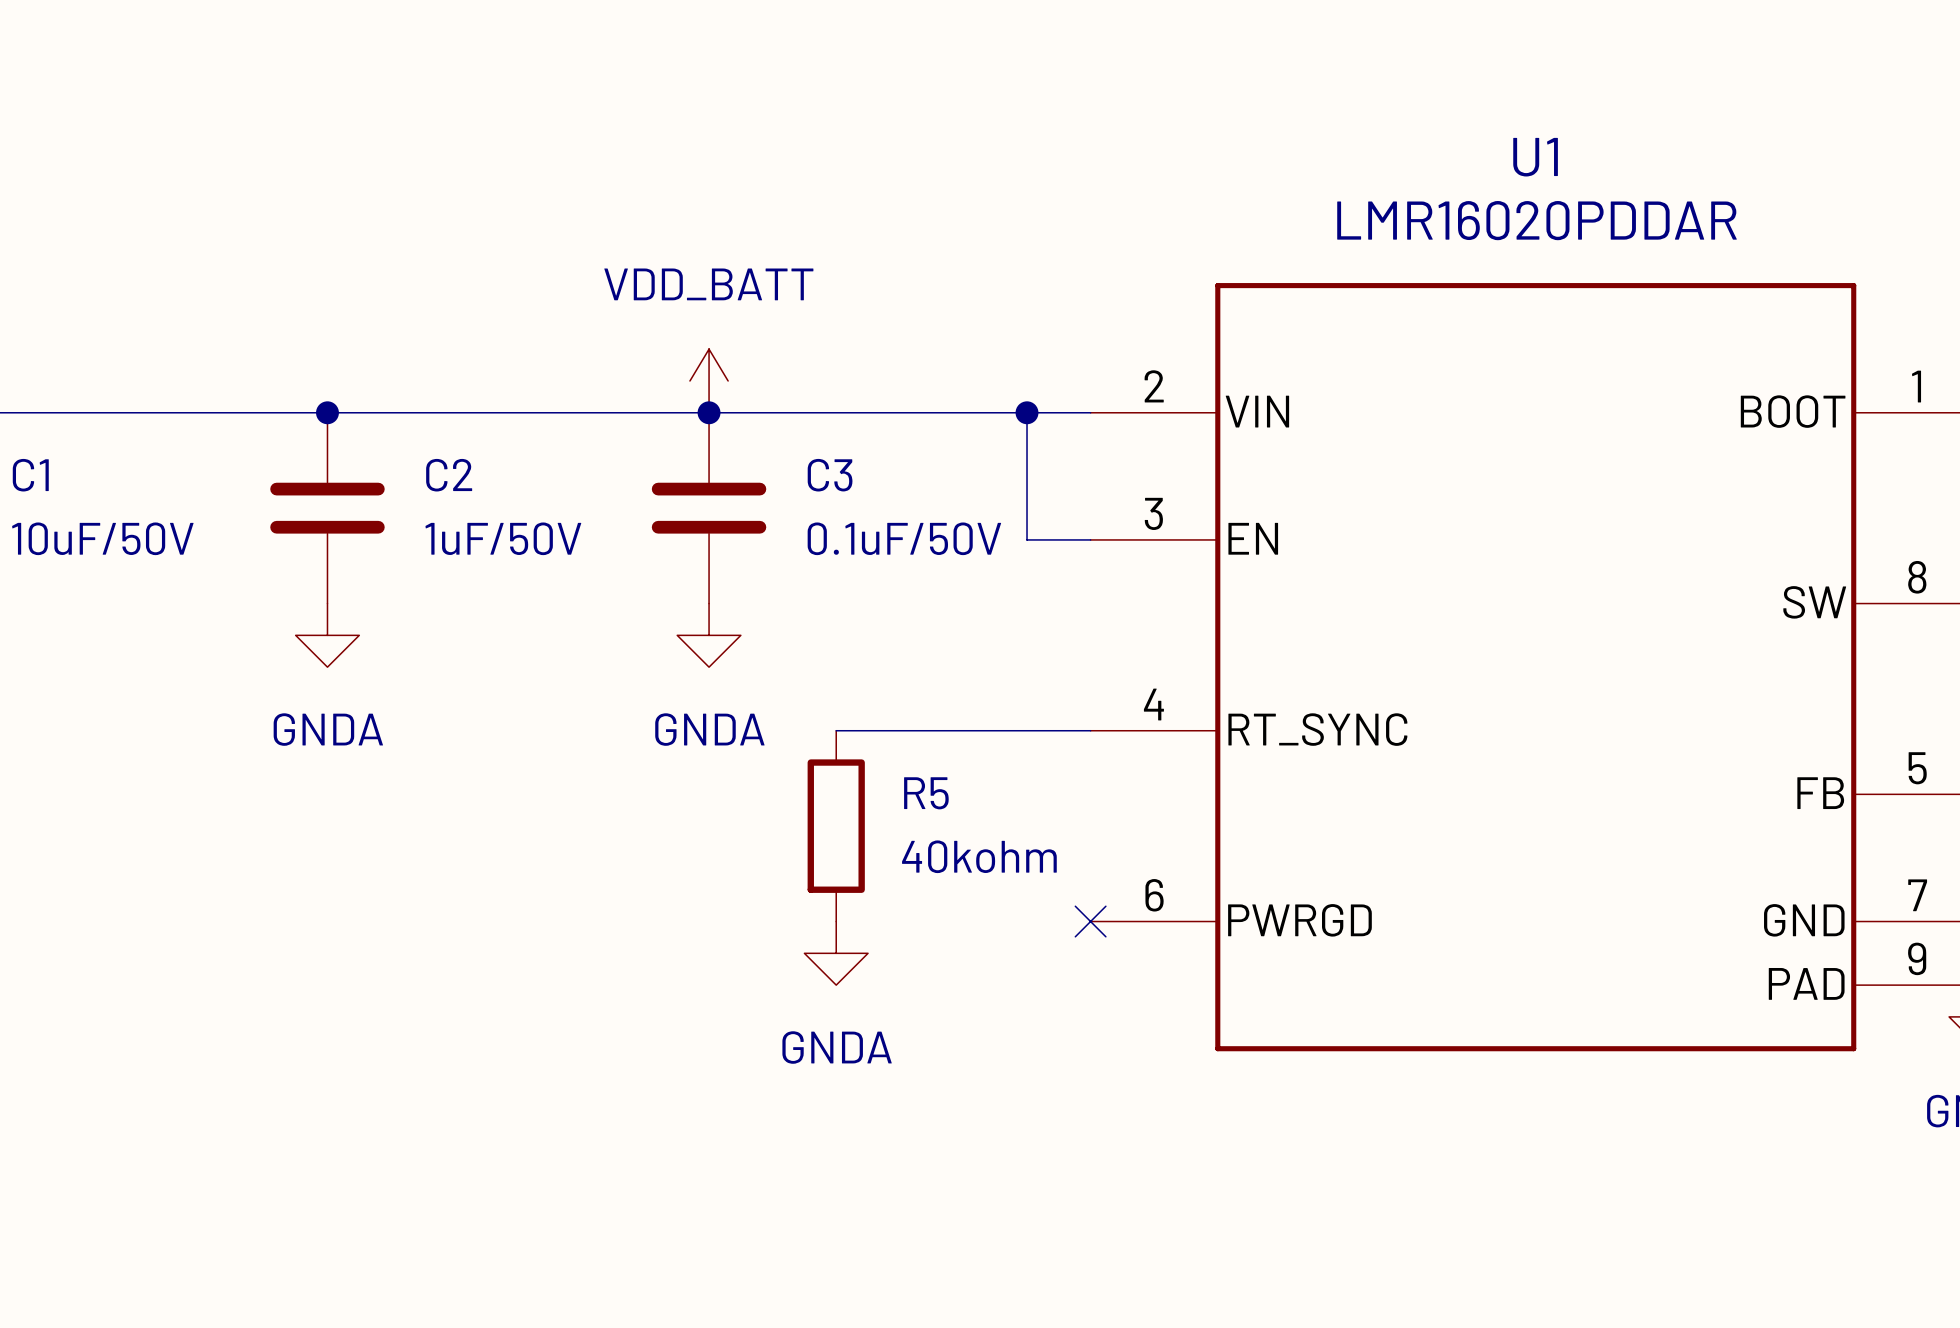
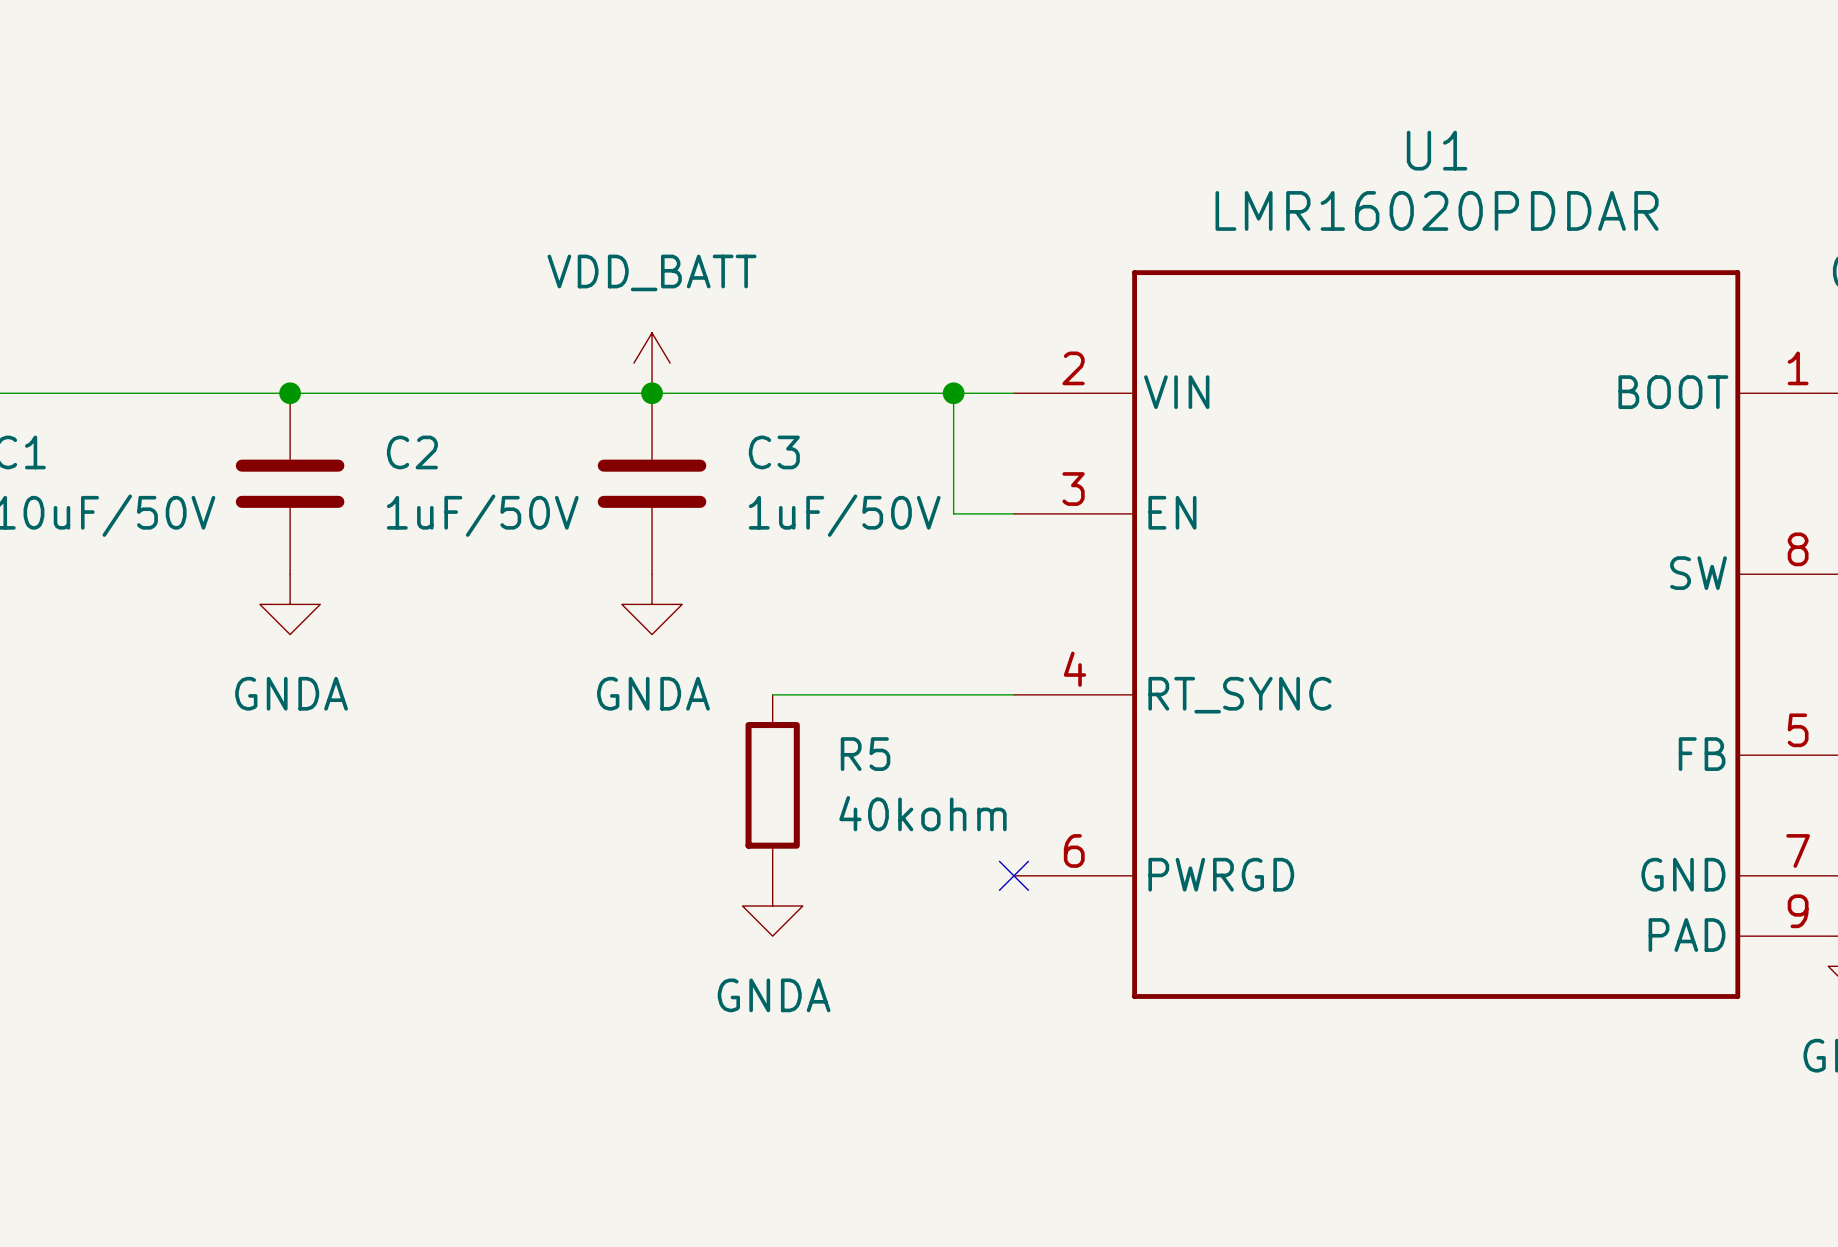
C3 value: 0.1uF/50V (904, 538) -> 1uF/50V (844, 515)

